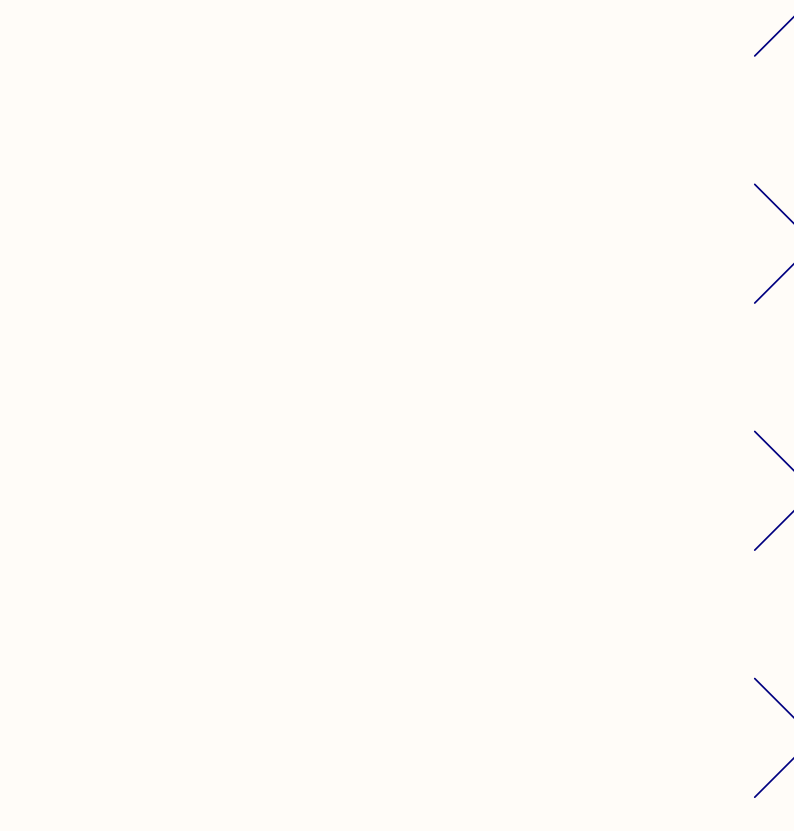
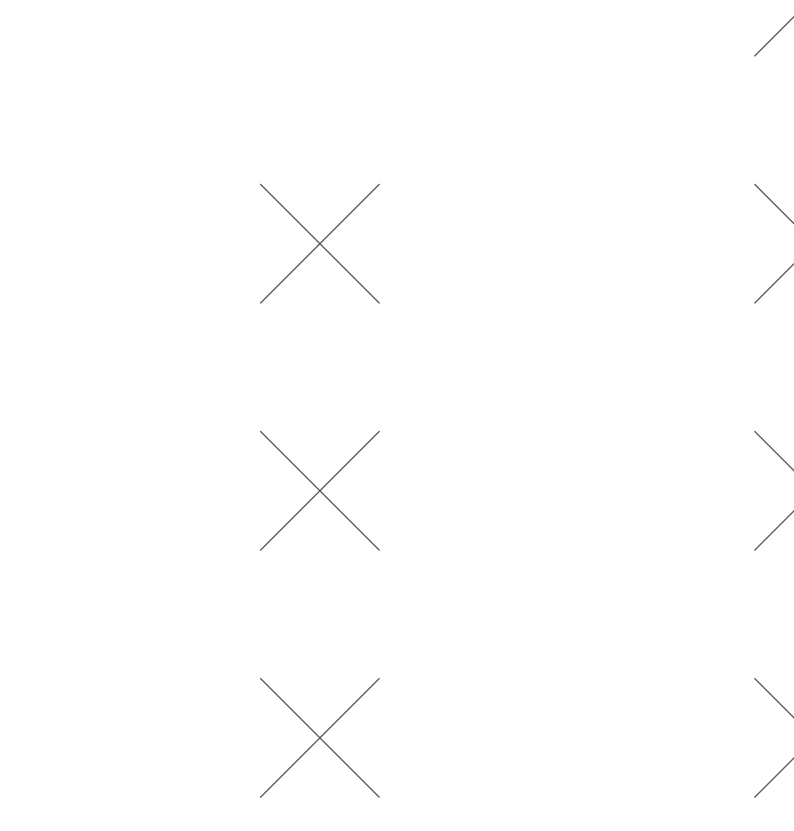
no-connect mark: none -> (319, 243)
no-connect mark: none -> (319, 490)
no-connect mark: none -> (319, 737)

